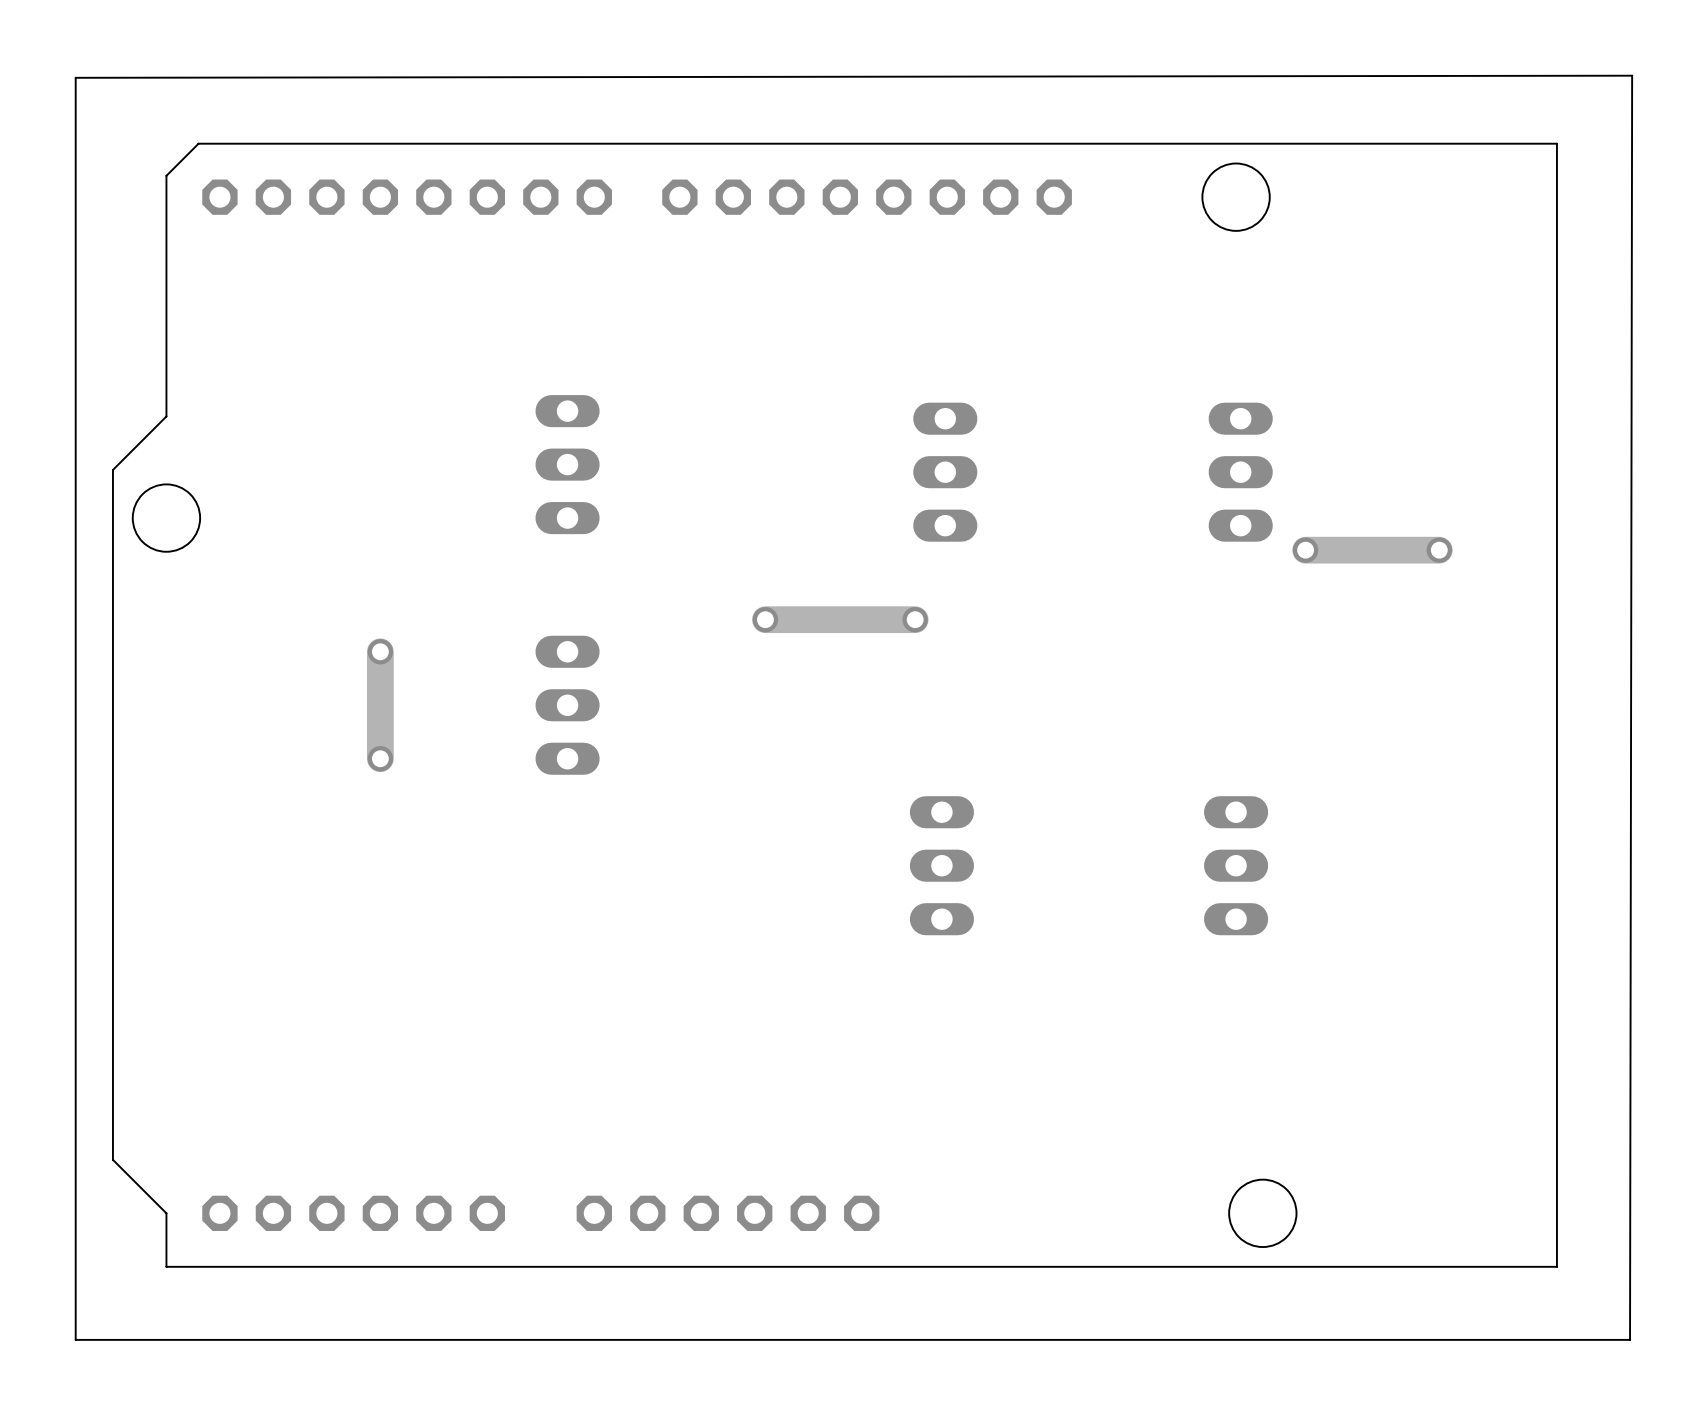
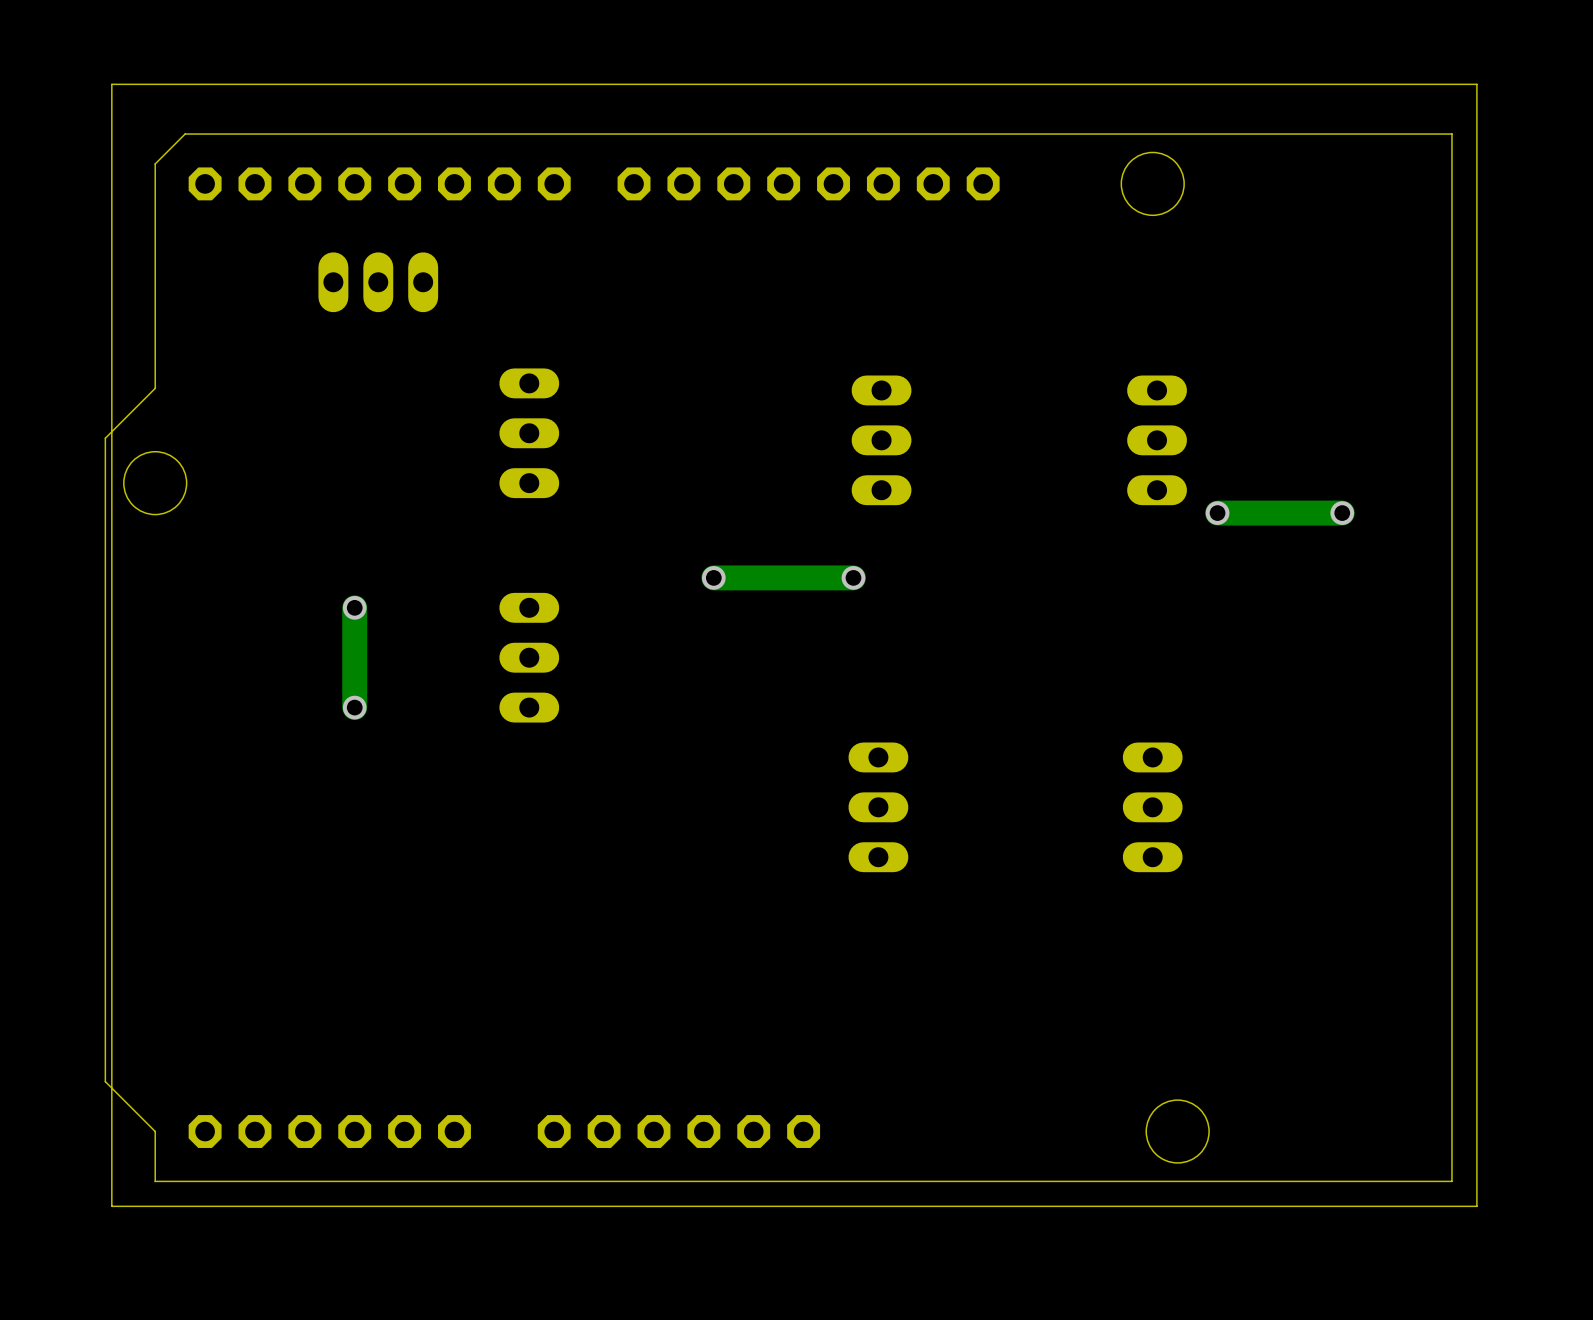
board edge: (1632, 75) (75, 77) (75, 1339) (1630, 1339) (1632, 75) -> (1476, 84) (1476, 1206) (111, 1206) (111, 84) (1476, 84)
part: none -> (378, 282)

